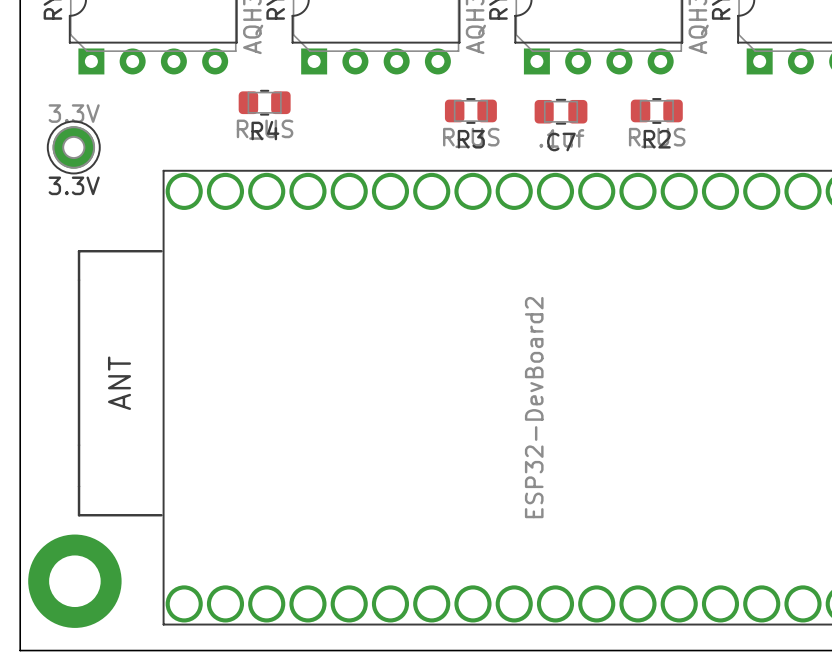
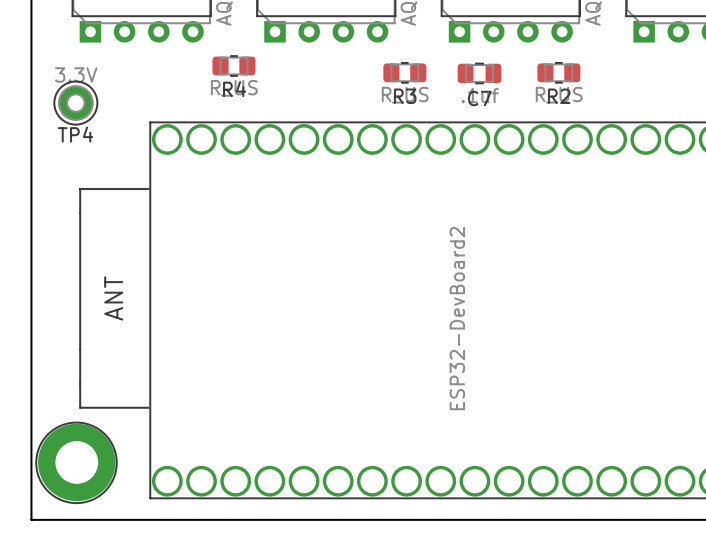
3.3V name: 3.3V (74, 185) -> TP4 (75, 134)
part footprint: [28, 534, 122, 628] -> [35, 421, 118, 504]

